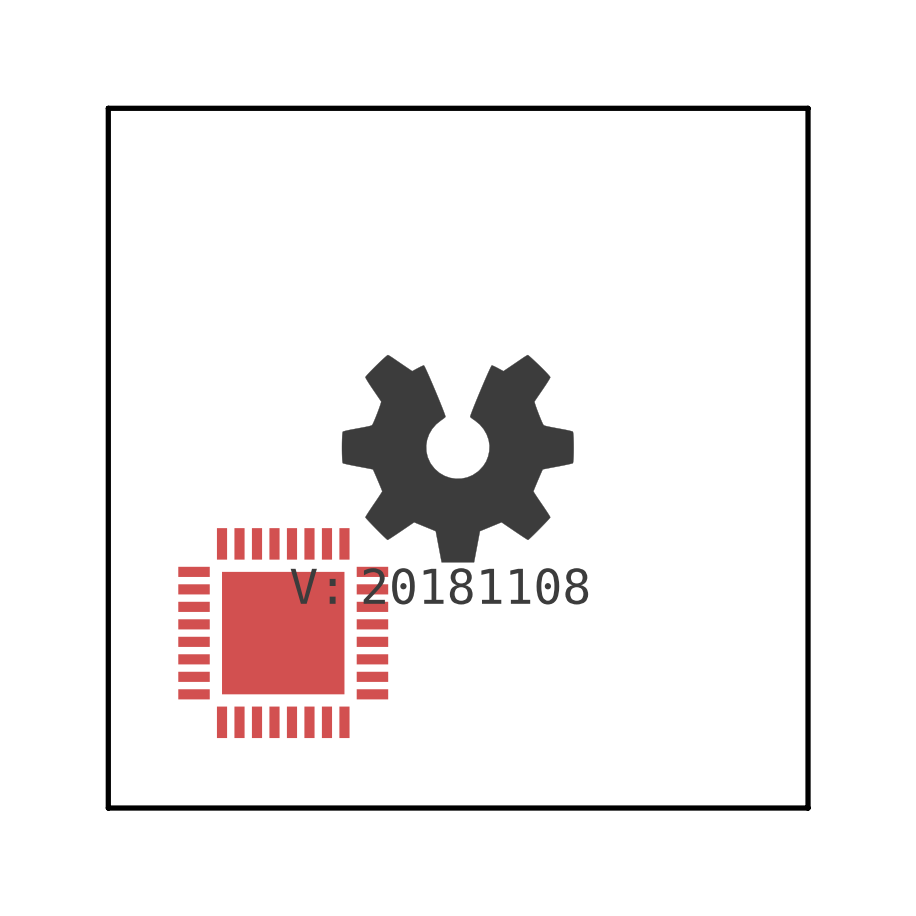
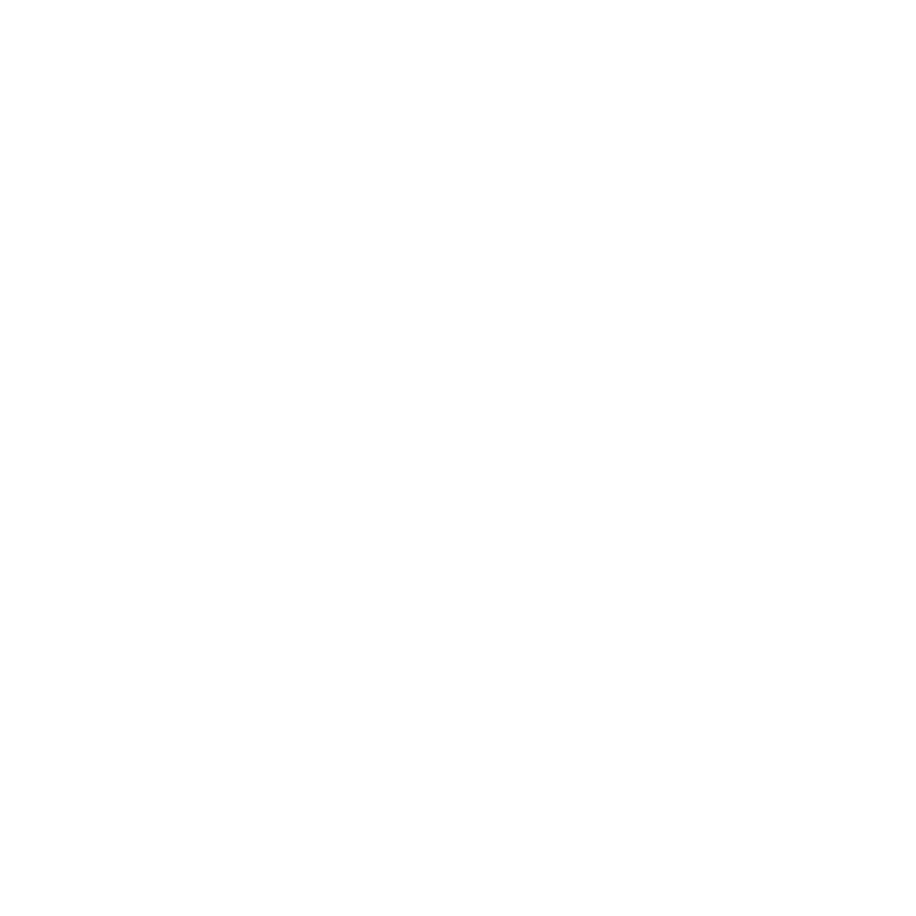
board edge: (808, 108) (108, 108) (108, 808) (808, 808) (808, 108) -> none
drawing: [341, 354, 574, 563] -> none
part: (283, 633) -> none

